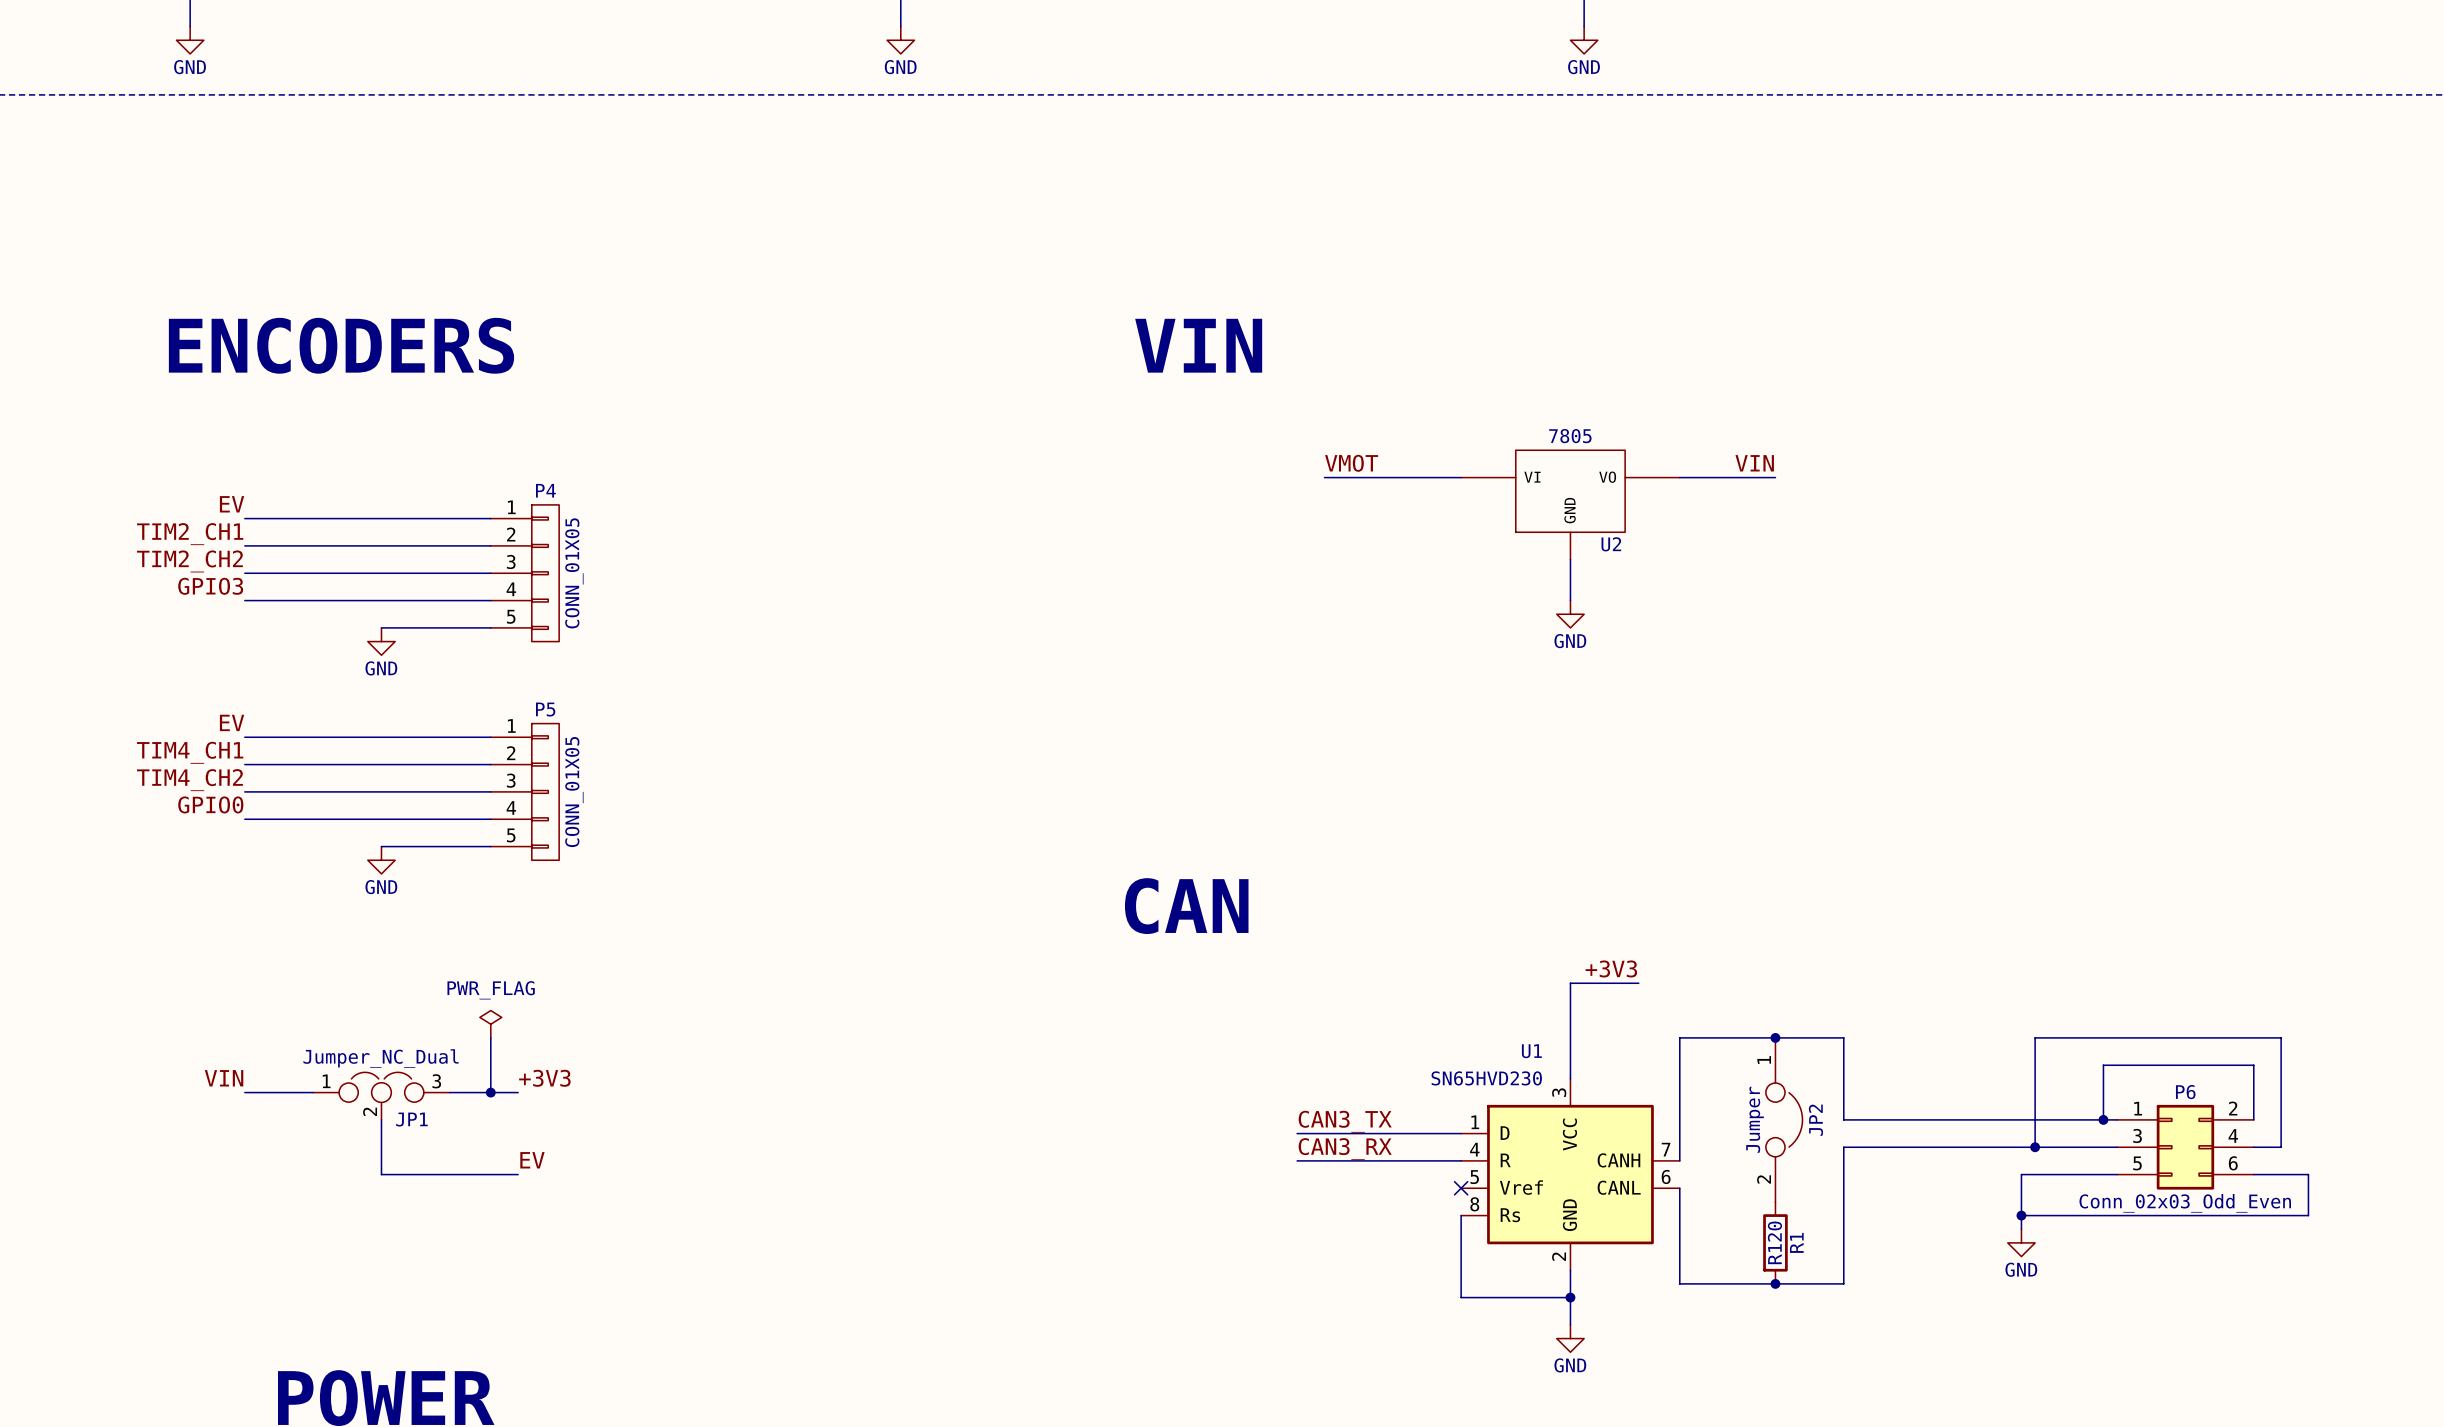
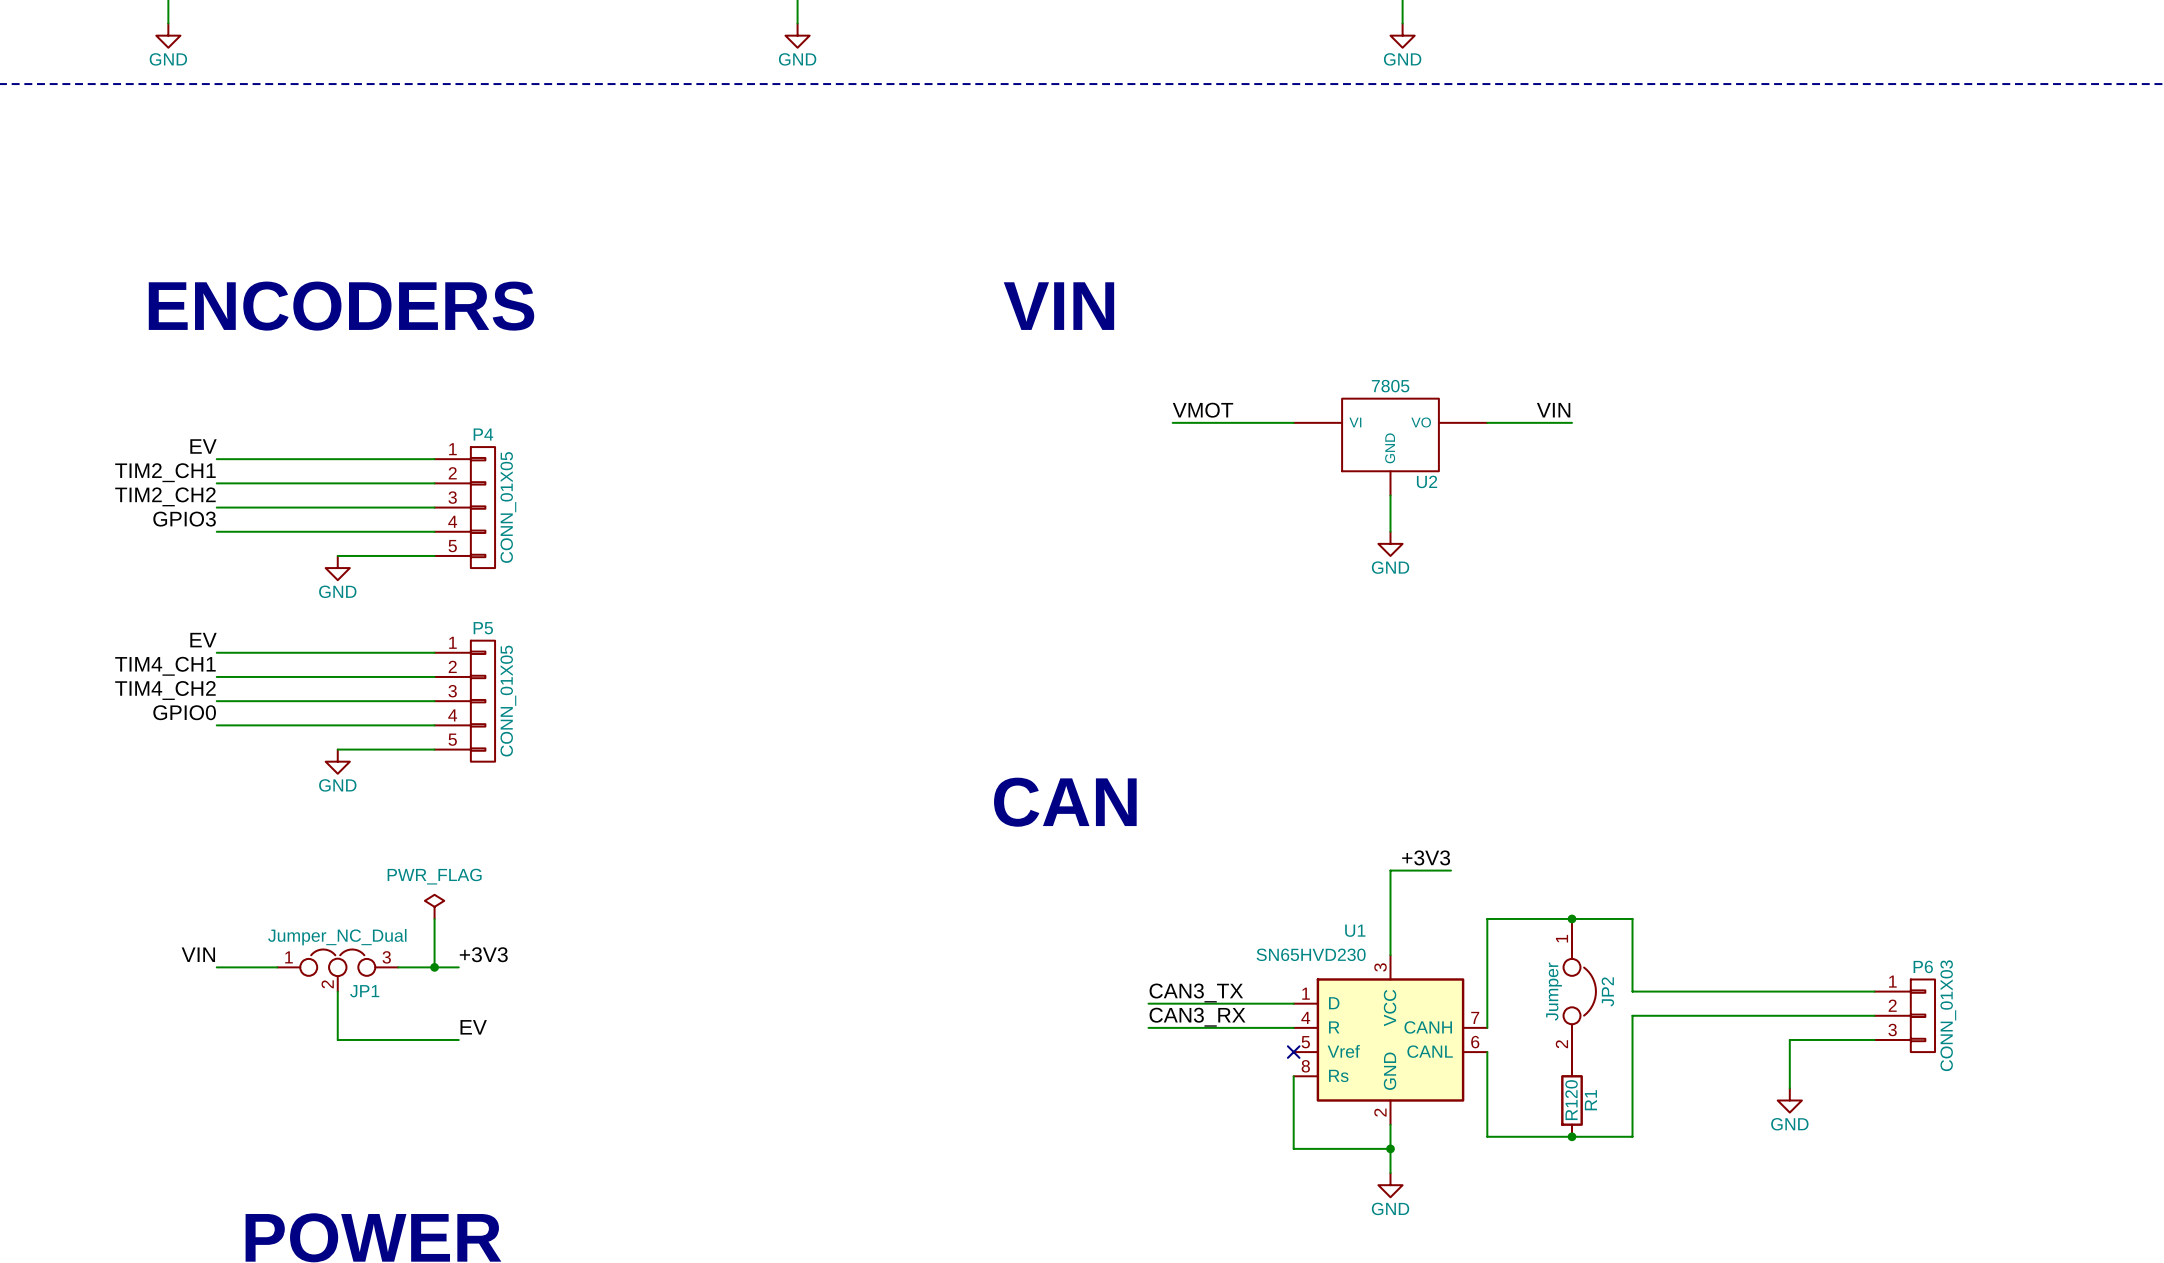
P6 symbol: [2117, 1104, 2254, 1190] -> [1874, 979, 1936, 1053]
wire: (2103, 1119) (2103, 1065) (2253, 1065) (2253, 1119) -> none
junction: (2103, 1119) -> none
wire: (2035, 1147) (2035, 1037) (2281, 1037) (2281, 1147) (2253, 1147) -> none
junction: (2035, 1147) -> none
wire: (2253, 1174) (2308, 1174) (2308, 1215) (2021, 1215) -> none
P6 value: Conn_02x03_Odd_Even (2185, 1203) -> CONN_01X03 (1948, 1015)
junction: (2021, 1215) -> none

